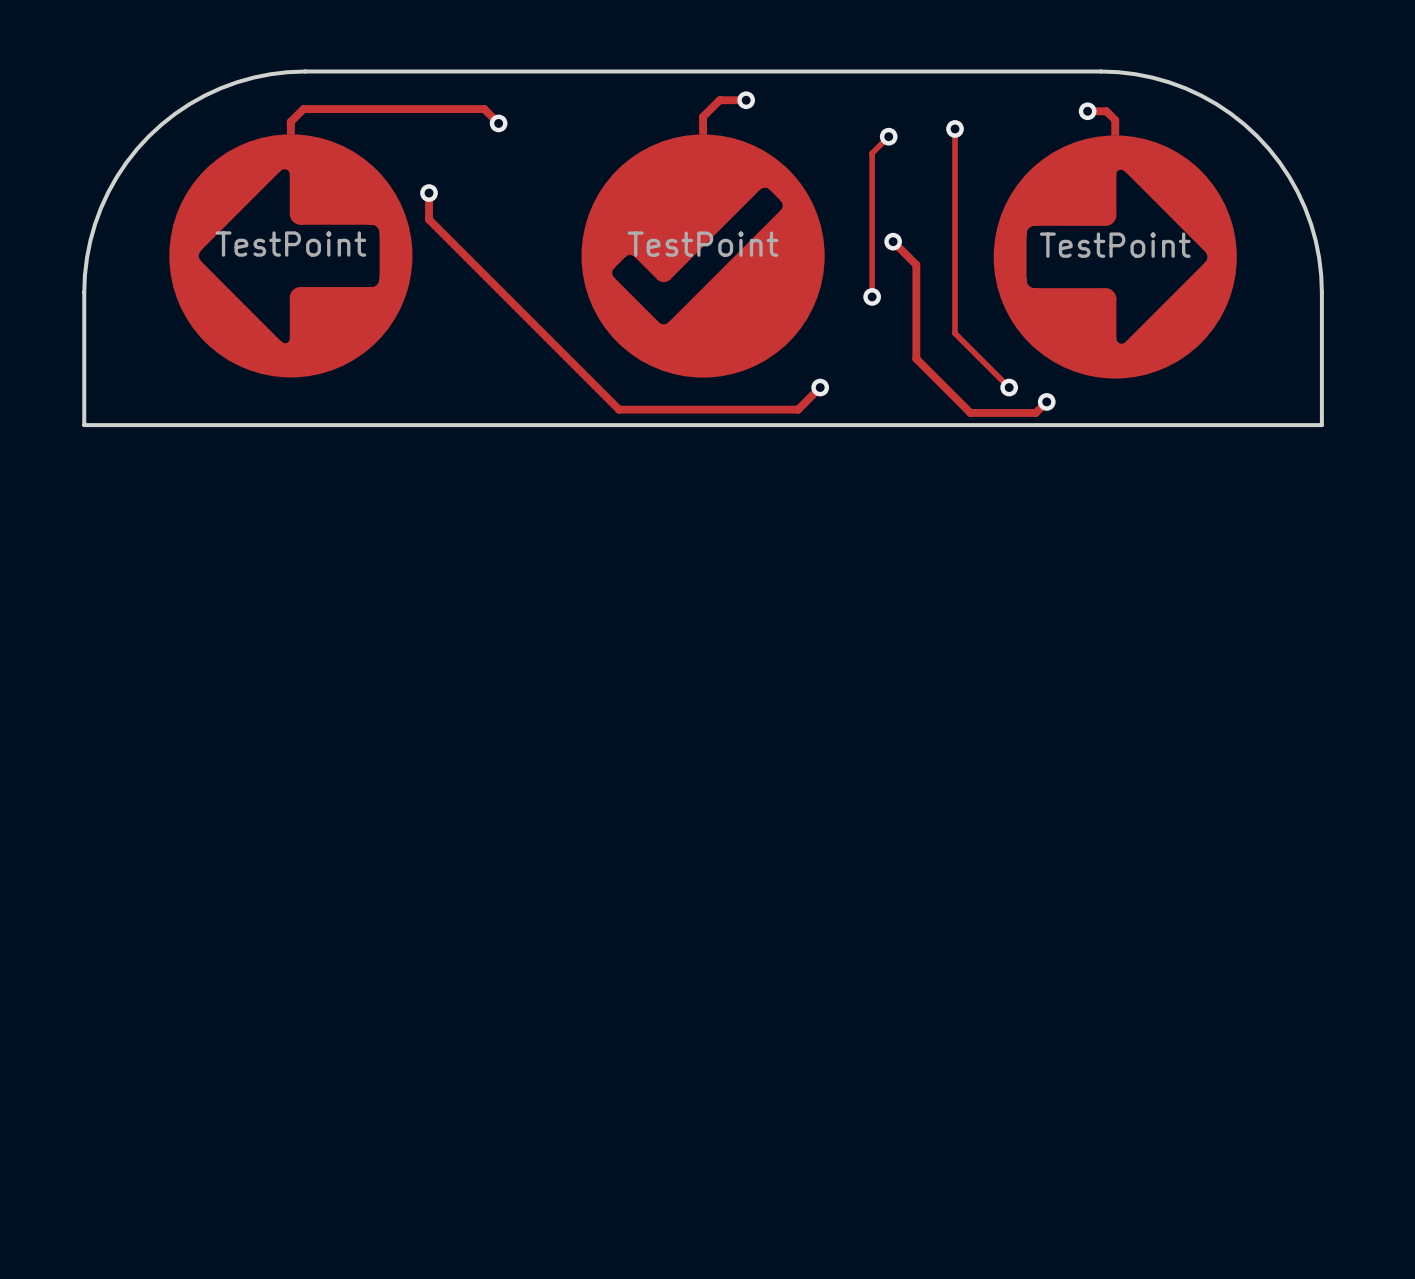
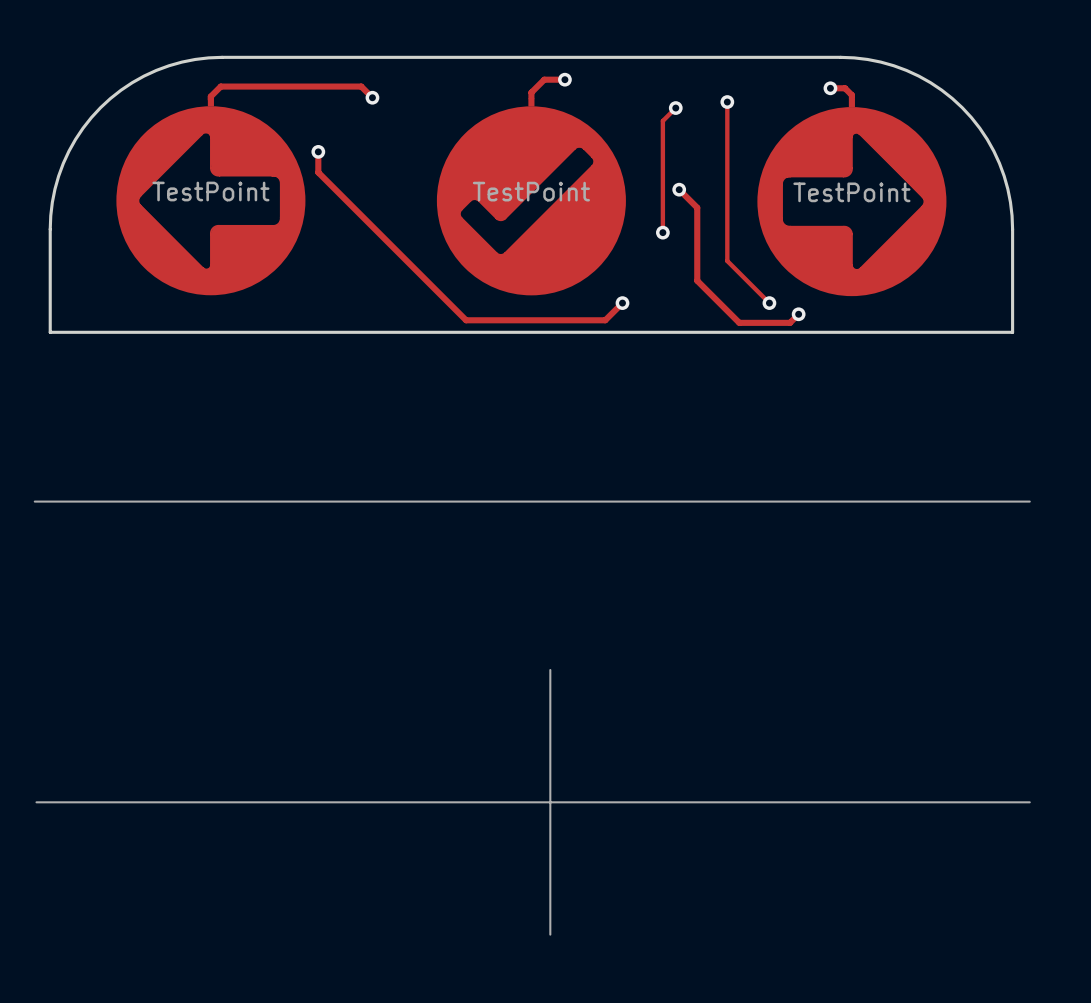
line: none -> (34, 501) (1029, 501)
line: none -> (550, 669) (550, 934)
line: none -> (36, 802) (1029, 802)

